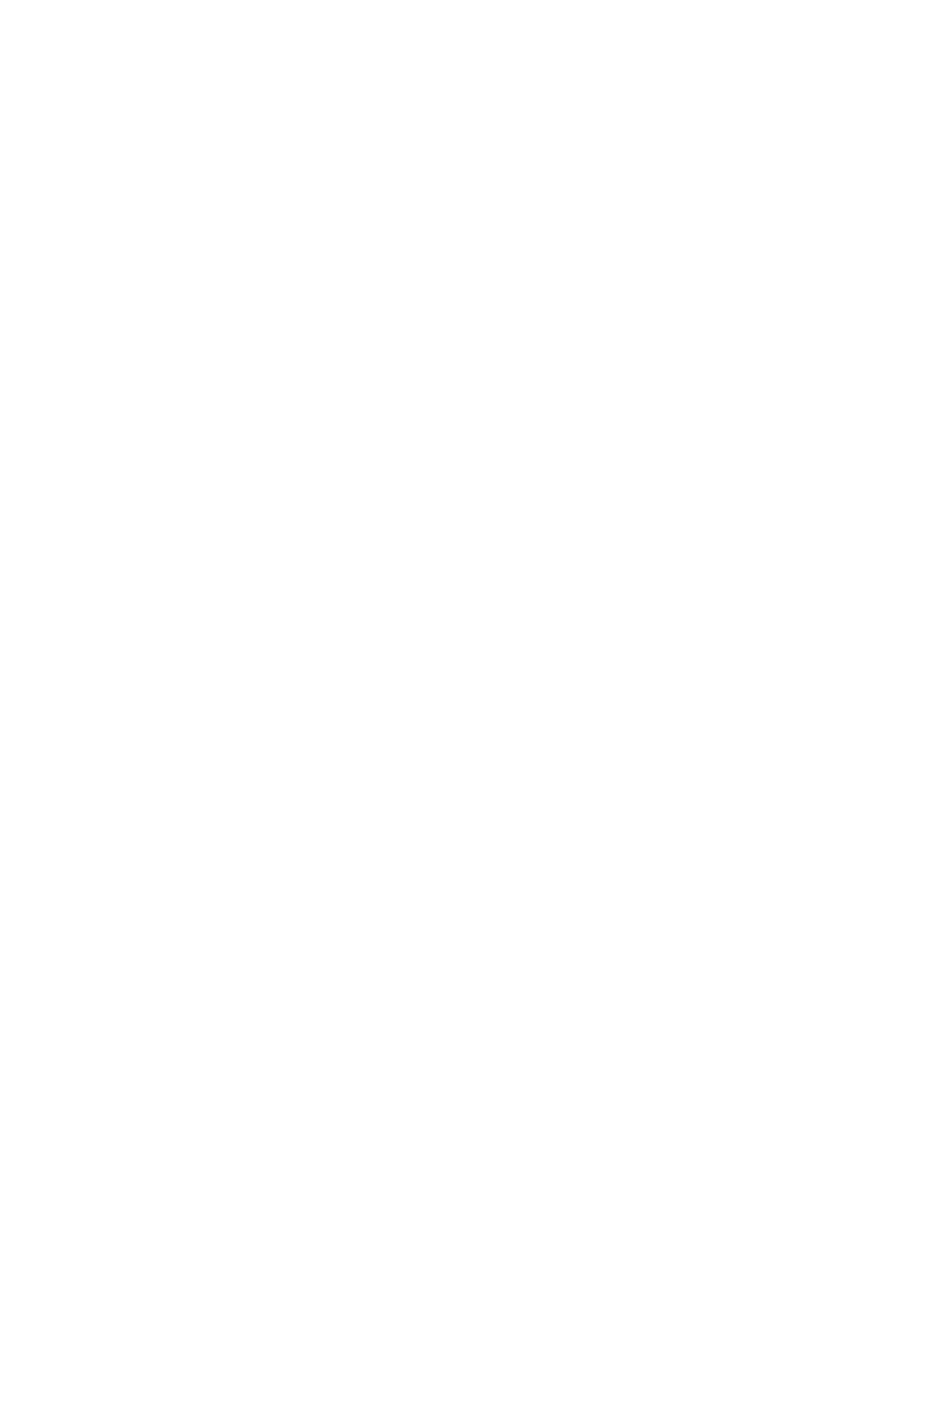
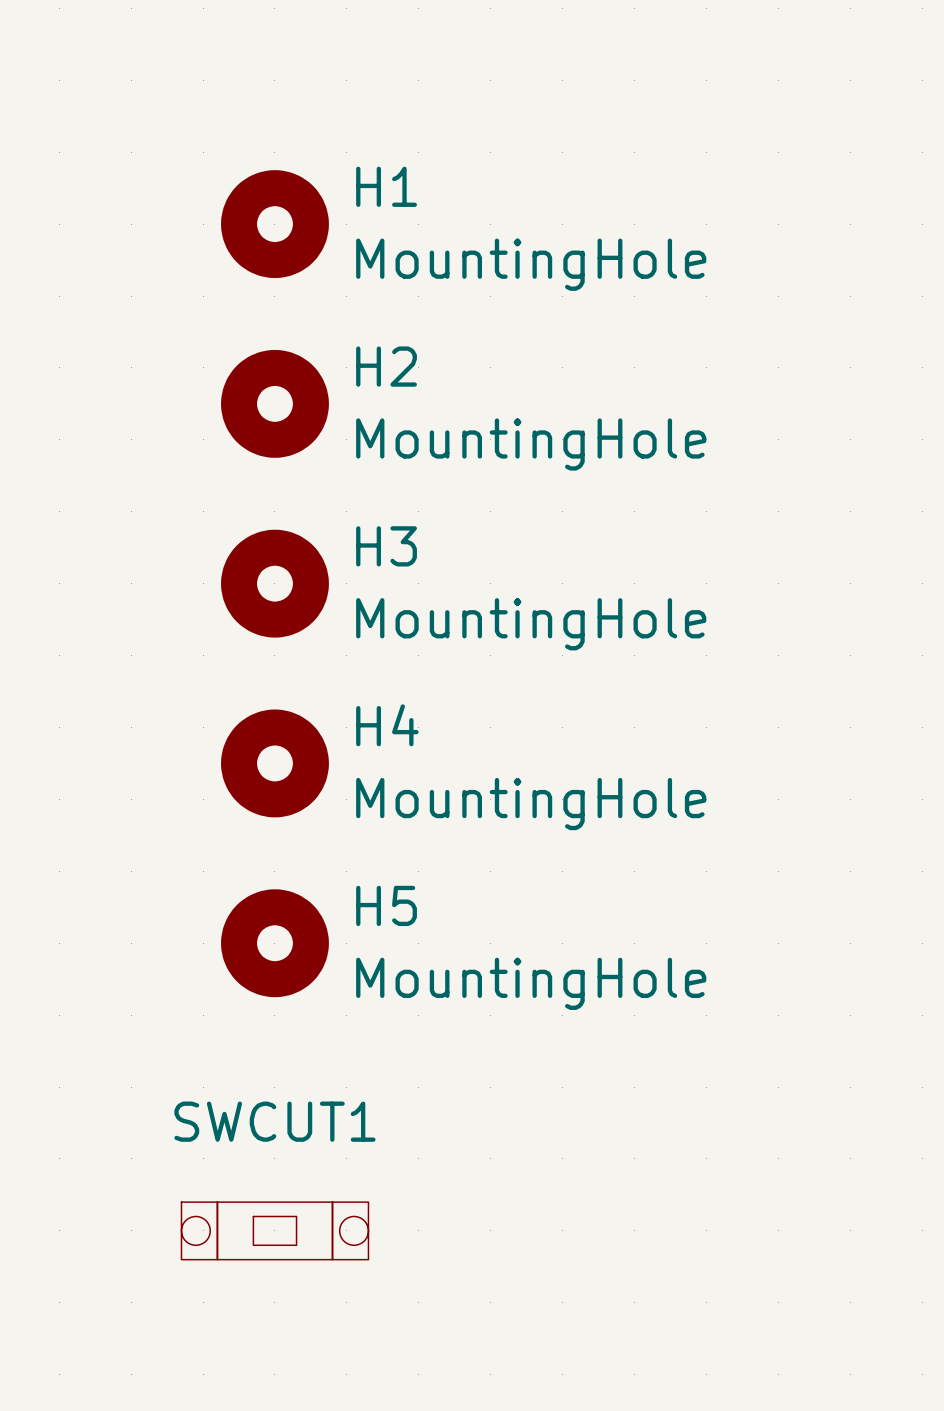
H1: none -> MountingHole (274, 224)
H2: none -> MountingHole (274, 403)
H3: none -> MountingHole (274, 583)
H4: none -> MountingHole (274, 763)
H5: none -> MountingHole (274, 943)
SWCUT1: none -> (274, 1230)

